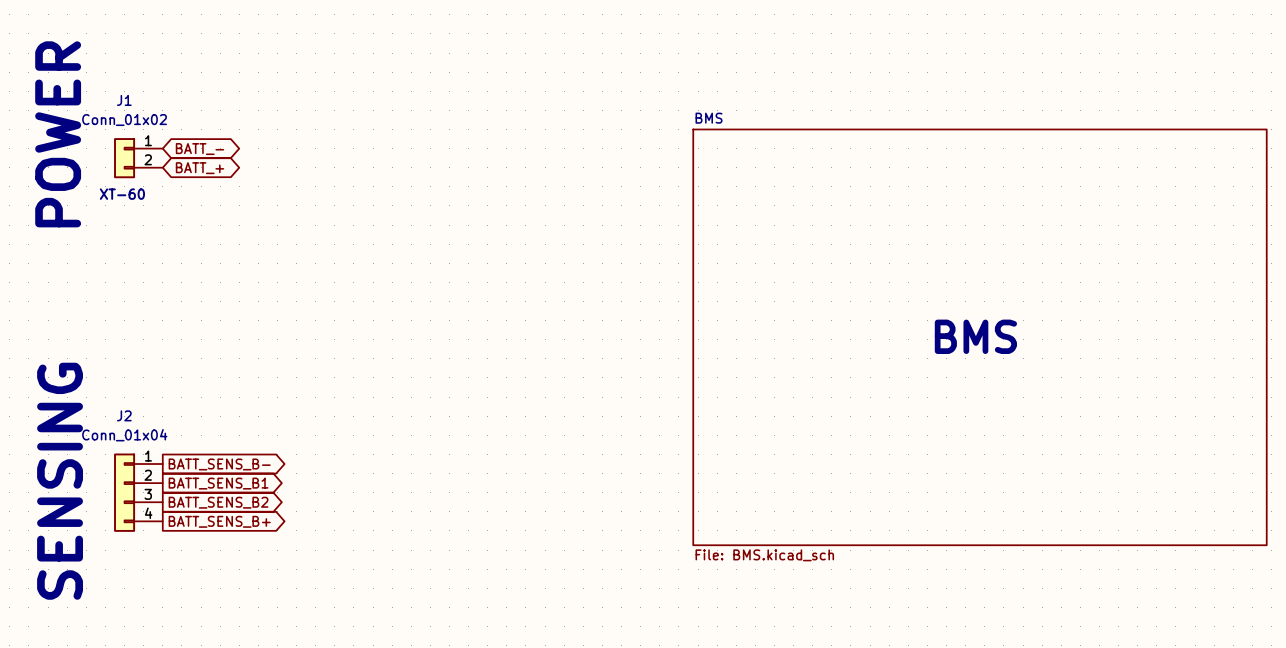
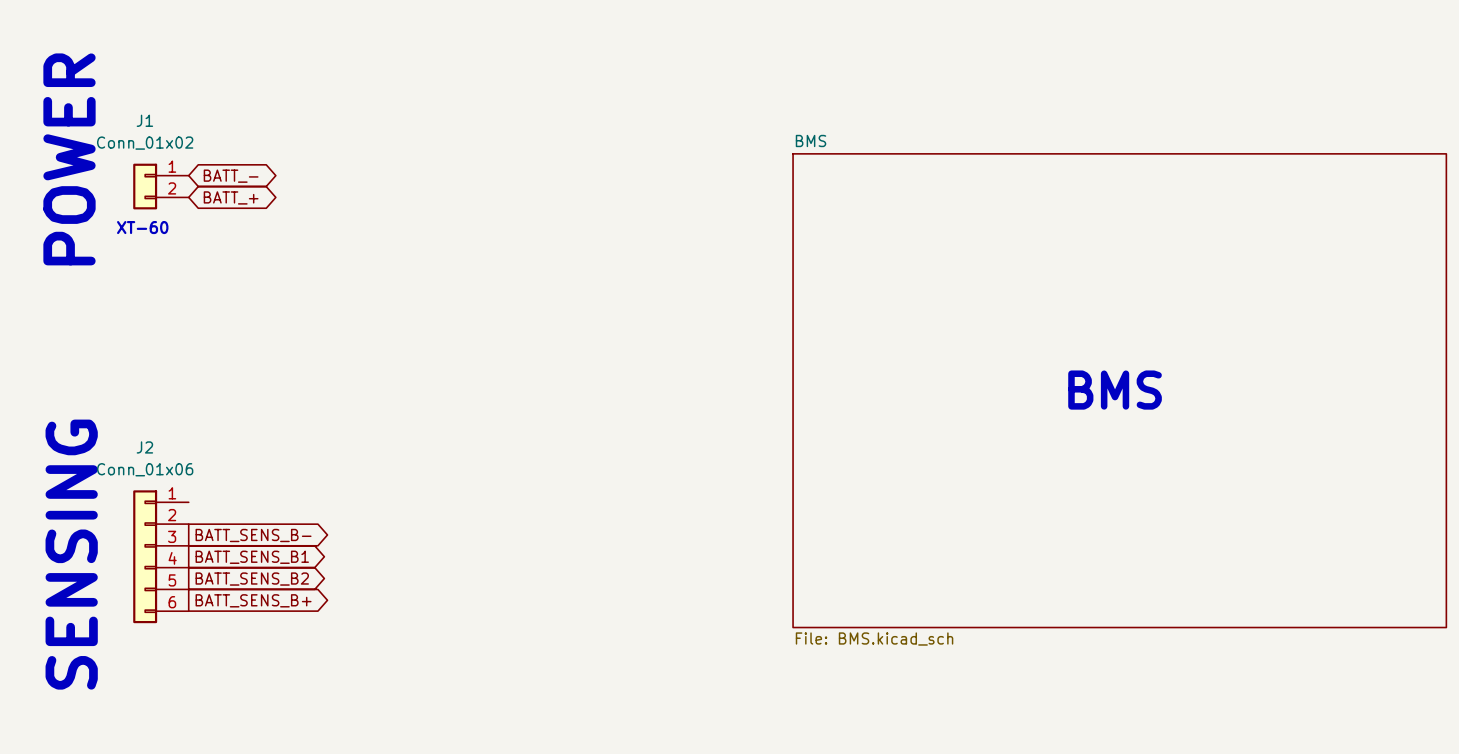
J2 name position: J2 (124, 415) -> J2 (144, 447)
J2 value: Conn_01x04 (124, 435) -> Conn_01x06 (145, 469)
J2 symbol: [114, 453, 163, 532] -> [133, 490, 189, 624]

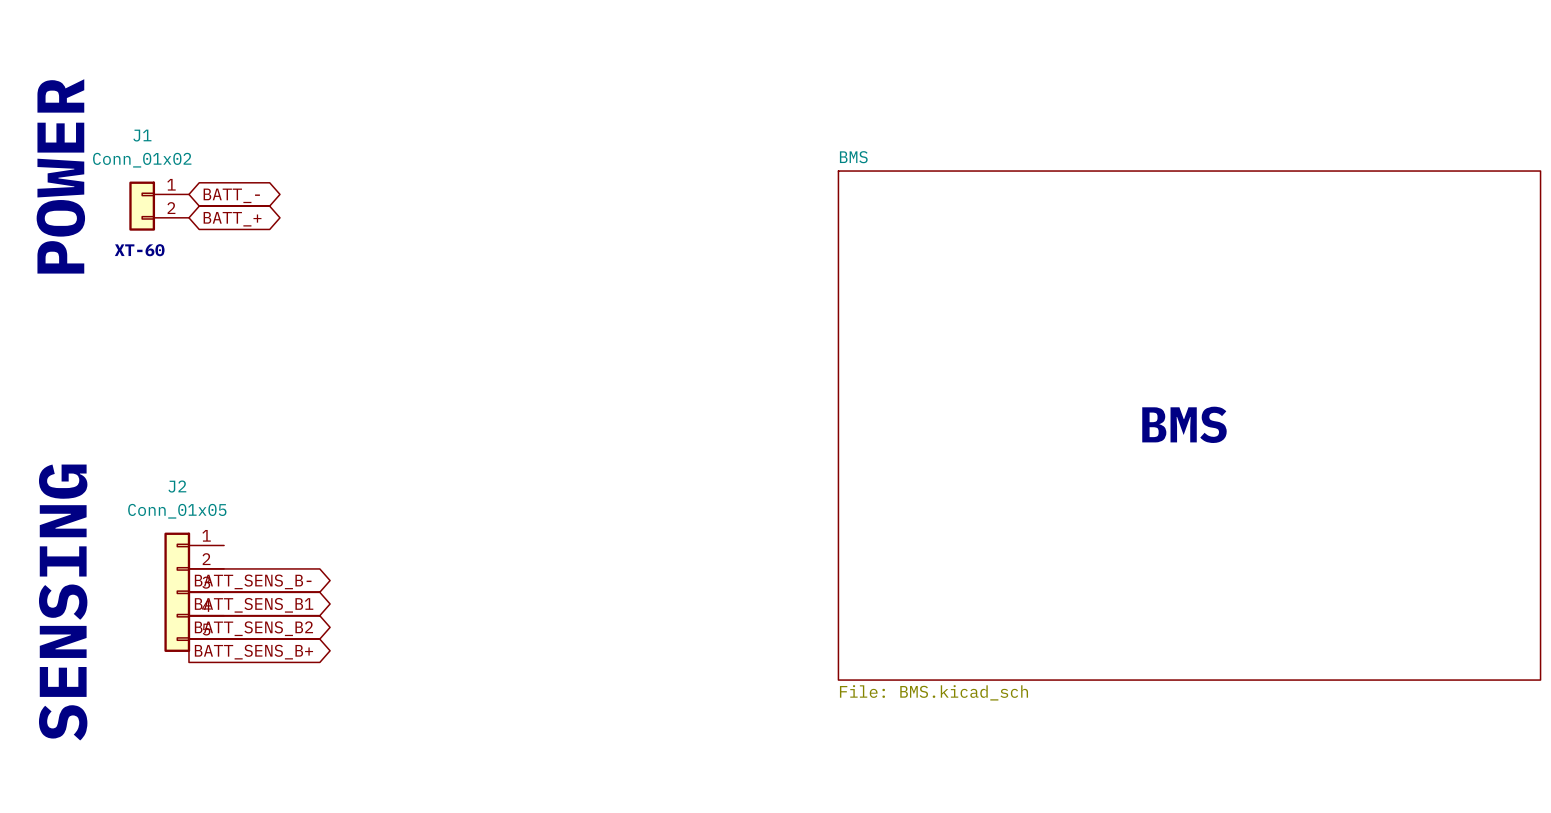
J2 value: Conn_01x06 (145, 469) -> Conn_01x05 (177, 511)
J2 symbol: [133, 490, 189, 624] -> [164, 532, 225, 652]

